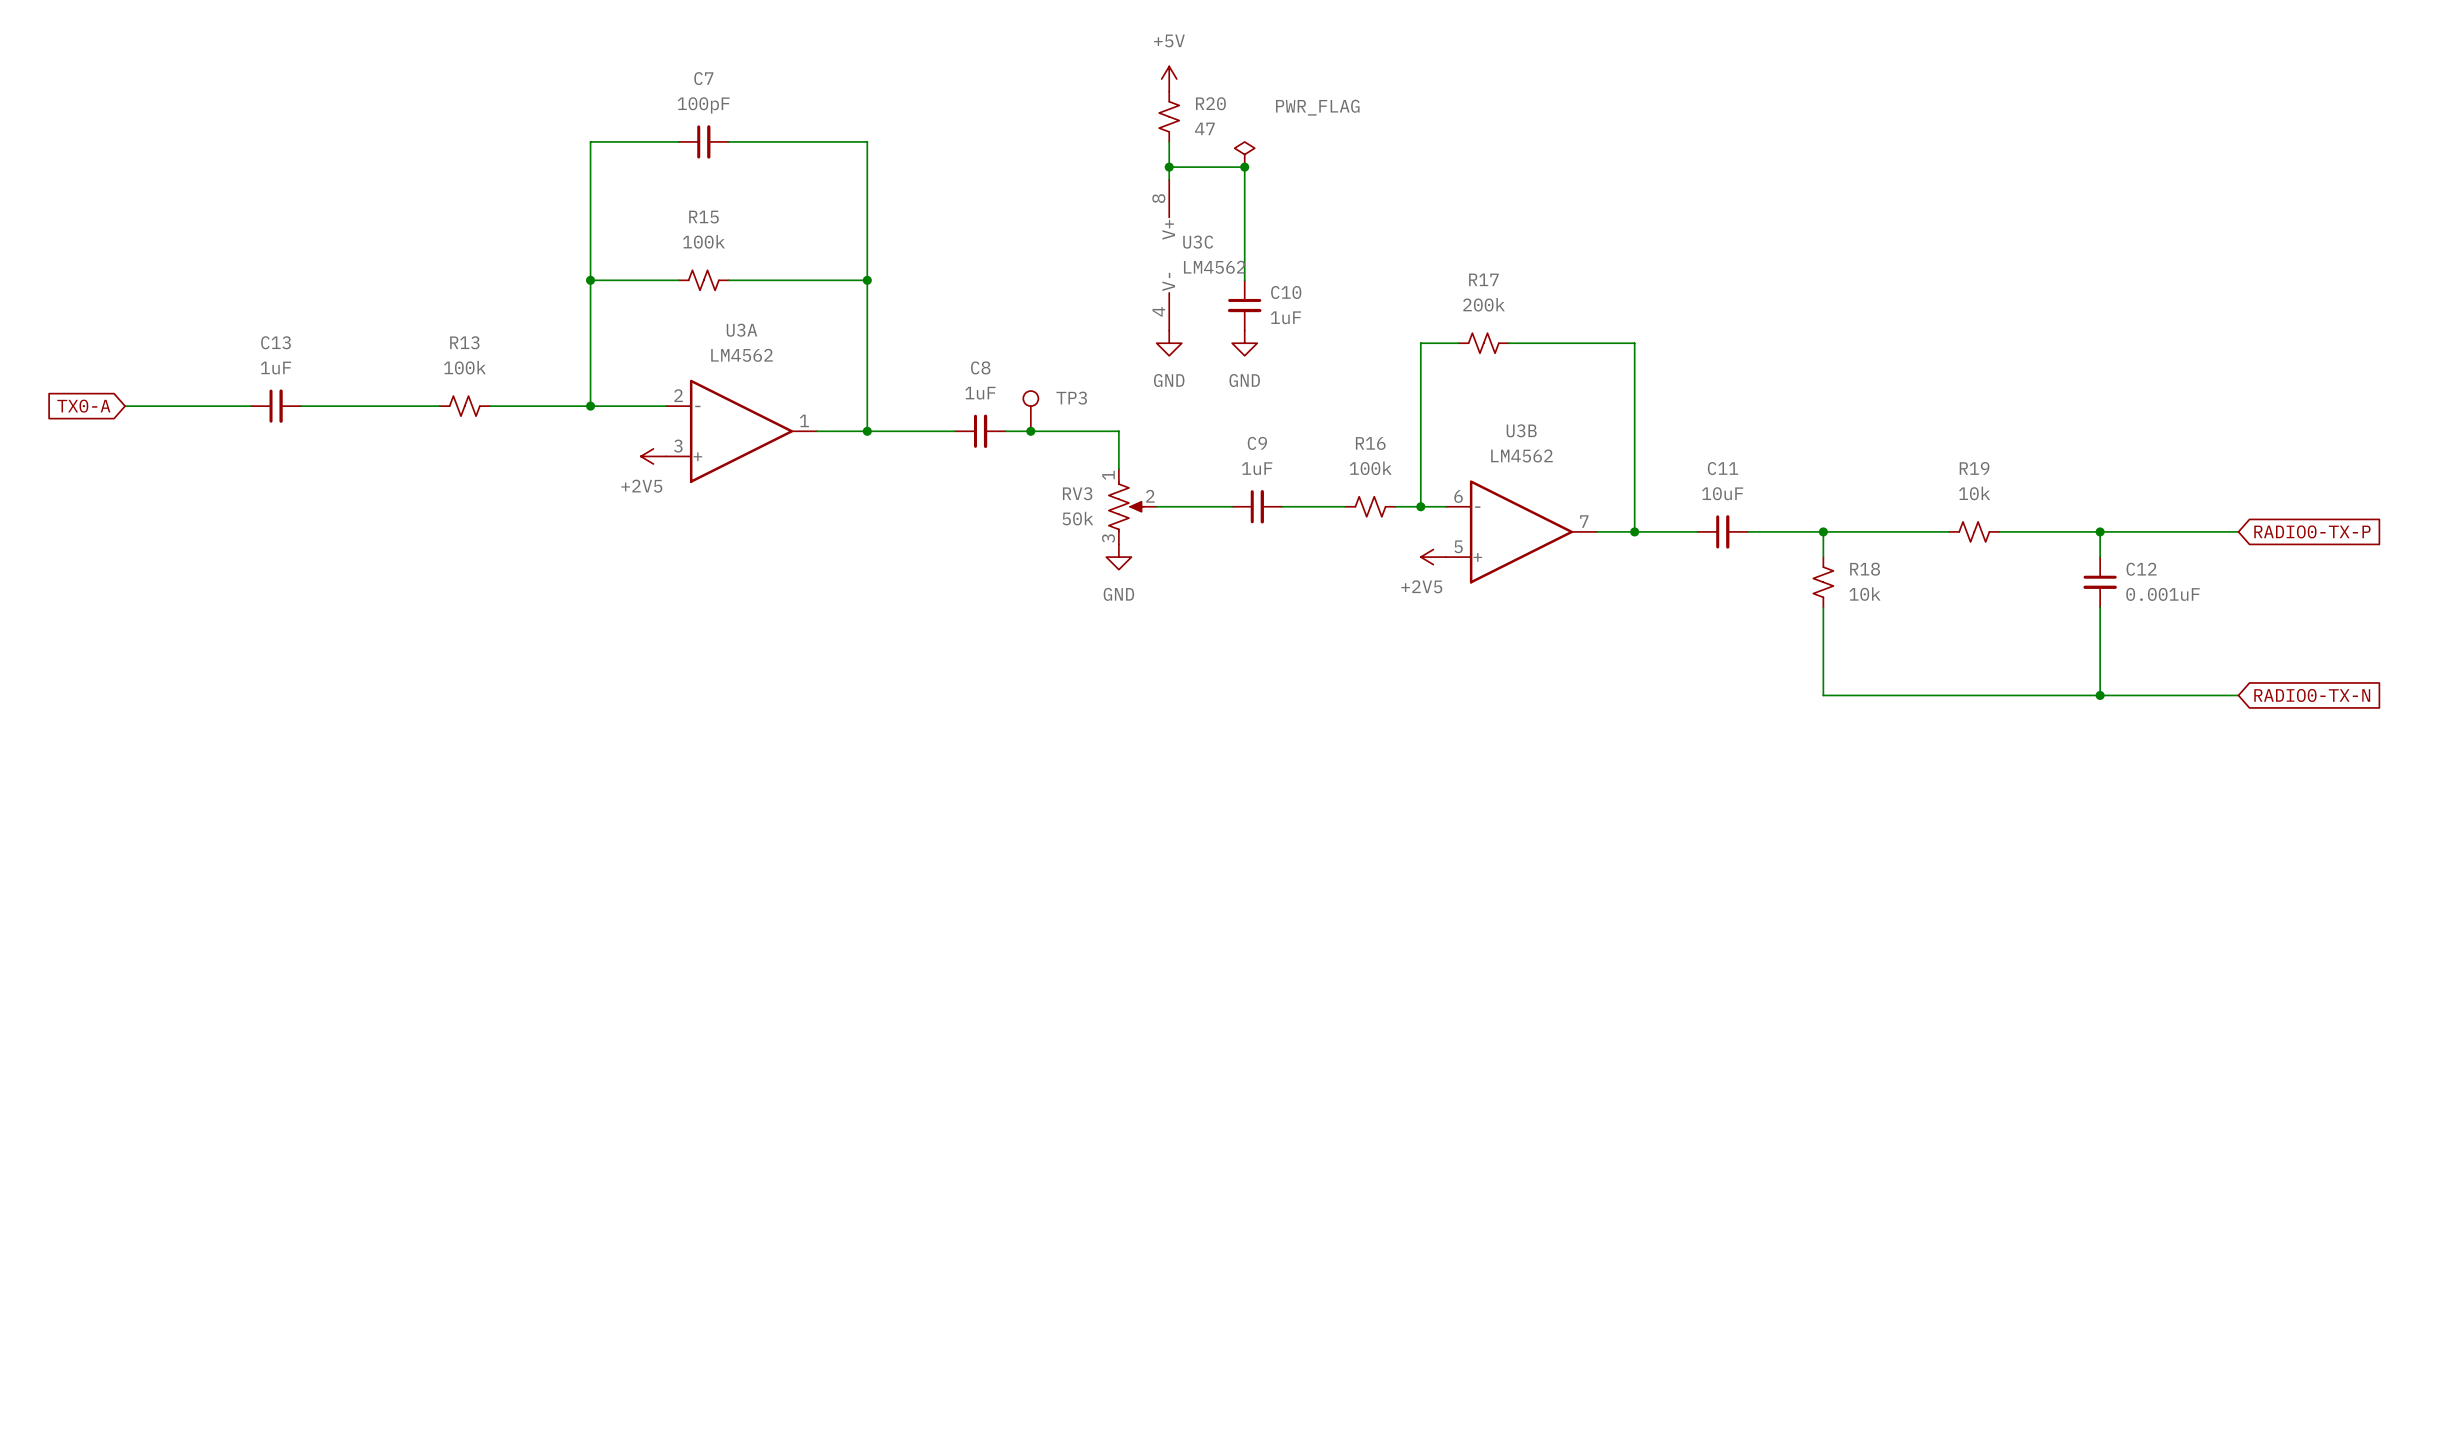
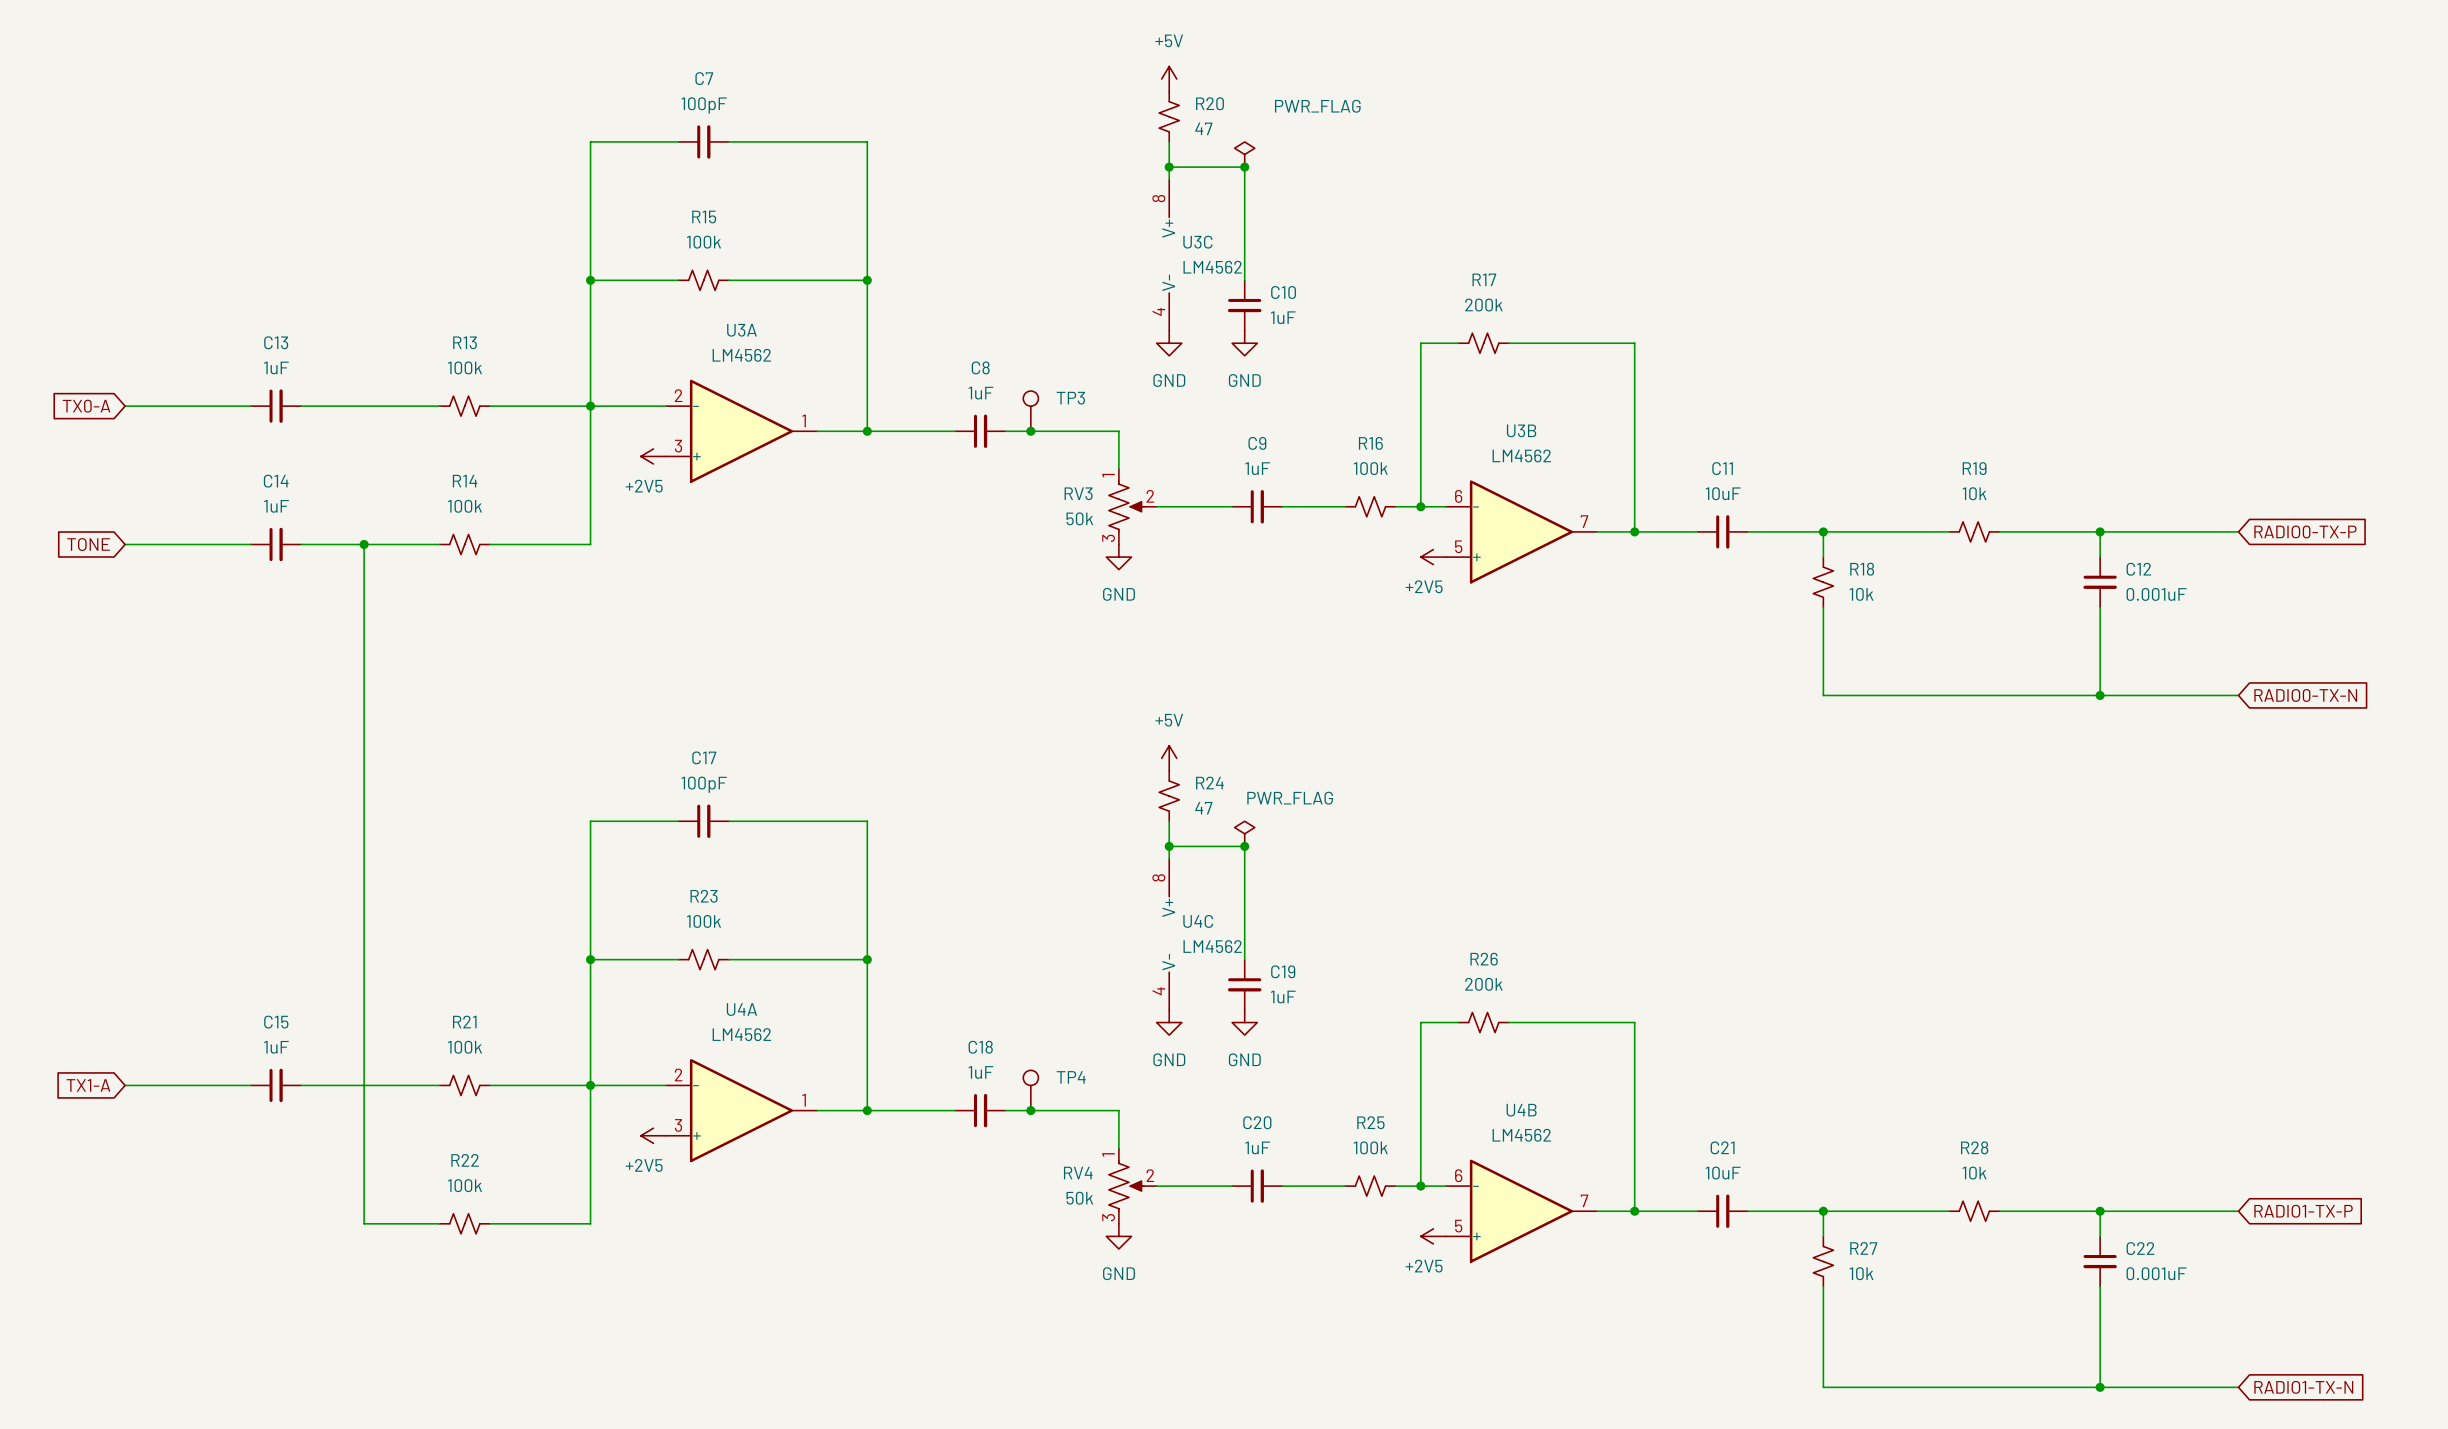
wire: none -> (590, 406) (590, 544) (489, 544)
global label: none -> TONE (88, 544)
wire: none -> (125, 544) (250, 544)
C14: none -> 1uF (276, 544)
wire: none -> (301, 544) (439, 544)
wire: none -> (364, 544) (364, 1223) (439, 1223)
junction: none -> (364, 544)
R14: none -> 100k (464, 544)
power symbol: none -> +5V (1169, 758)
R24: none -> 47 (1169, 796)
wire: none -> (678, 821) (590, 821) (590, 1223) (489, 1223)
C17: none -> 100pF (703, 821)
wire: none -> (728, 821) (867, 821) (867, 1110)
wire: none -> (1169, 821) (1169, 859)
power symbol: none -> PWR_FLAG (1244, 833)
wire: none -> (1169, 846) (1244, 846) (1244, 959)
junction: none -> (1169, 846)
junction: none -> (1244, 846)
U4C: none -> LM4562 (1169, 934)
wire: none -> (590, 959) (678, 959)
junction: none -> (590, 959)
R23: none -> 100k (703, 959)
wire: none -> (728, 959) (867, 959)
junction: none -> (867, 959)
C19: none -> 1uF (1244, 984)
power symbol: none -> GND (1169, 1022)
power symbol: none -> GND (1244, 1022)
wire: none -> (1458, 1022) (1420, 1022) (1420, 1186)
R26: none -> 200k (1483, 1022)
wire: none -> (1508, 1022) (1634, 1022) (1634, 1211)
global label: none -> TX1-A (88, 1085)
wire: none -> (125, 1085) (250, 1085)
C15: none -> 1uF (276, 1085)
wire: none -> (301, 1085) (439, 1085)
R21: none -> 100k (464, 1085)
wire: none -> (489, 1085) (666, 1085)
junction: none -> (590, 1085)
TP4: none -> (1030, 1090)
U4A: none -> LM4562 (741, 1110)
wire: none -> (816, 1110) (955, 1110)
junction: none -> (867, 1110)
C18: none -> 1uF (980, 1110)
wire: none -> (1005, 1110) (1118, 1110) (1118, 1148)
junction: none -> (1030, 1110)
power symbol: none -> +2V5 (653, 1135)
RV4: none -> 50k (1132, 1186)
wire: none -> (1156, 1186) (1232, 1186)
C20: none -> 1uF (1257, 1186)
wire: none -> (1282, 1186) (1345, 1186)
R25: none -> 100k (1370, 1186)
wire: none -> (1395, 1186) (1445, 1186)
junction: none -> (1420, 1186)
U4B: none -> LM4562 (1521, 1211)
wire: none -> (1596, 1211) (1697, 1211)
junction: none -> (1634, 1211)
C21: none -> 10uF (1722, 1211)
wire: none -> (1747, 1211) (1949, 1211)
wire: none -> (1823, 1211) (1823, 1236)
junction: none -> (1823, 1211)
R28: none -> 10k (1974, 1211)
wire: none -> (1999, 1211) (2238, 1211)
wire: none -> (2100, 1211) (2100, 1236)
junction: none -> (2100, 1211)
global label: none -> RADIO1-TX-P (2303, 1211)
R22: none -> 100k (464, 1223)
power symbol: none -> GND (1118, 1236)
power symbol: none -> +2V5 (1433, 1236)
R27: none -> 10k (1823, 1261)
C22: none -> 0.001uF (2100, 1261)
wire: none -> (1823, 1286) (1823, 1387) (2238, 1387)
wire: none -> (2100, 1286) (2100, 1387)
junction: none -> (2100, 1387)
global label: none -> RADIO1-TX-N (2303, 1387)

